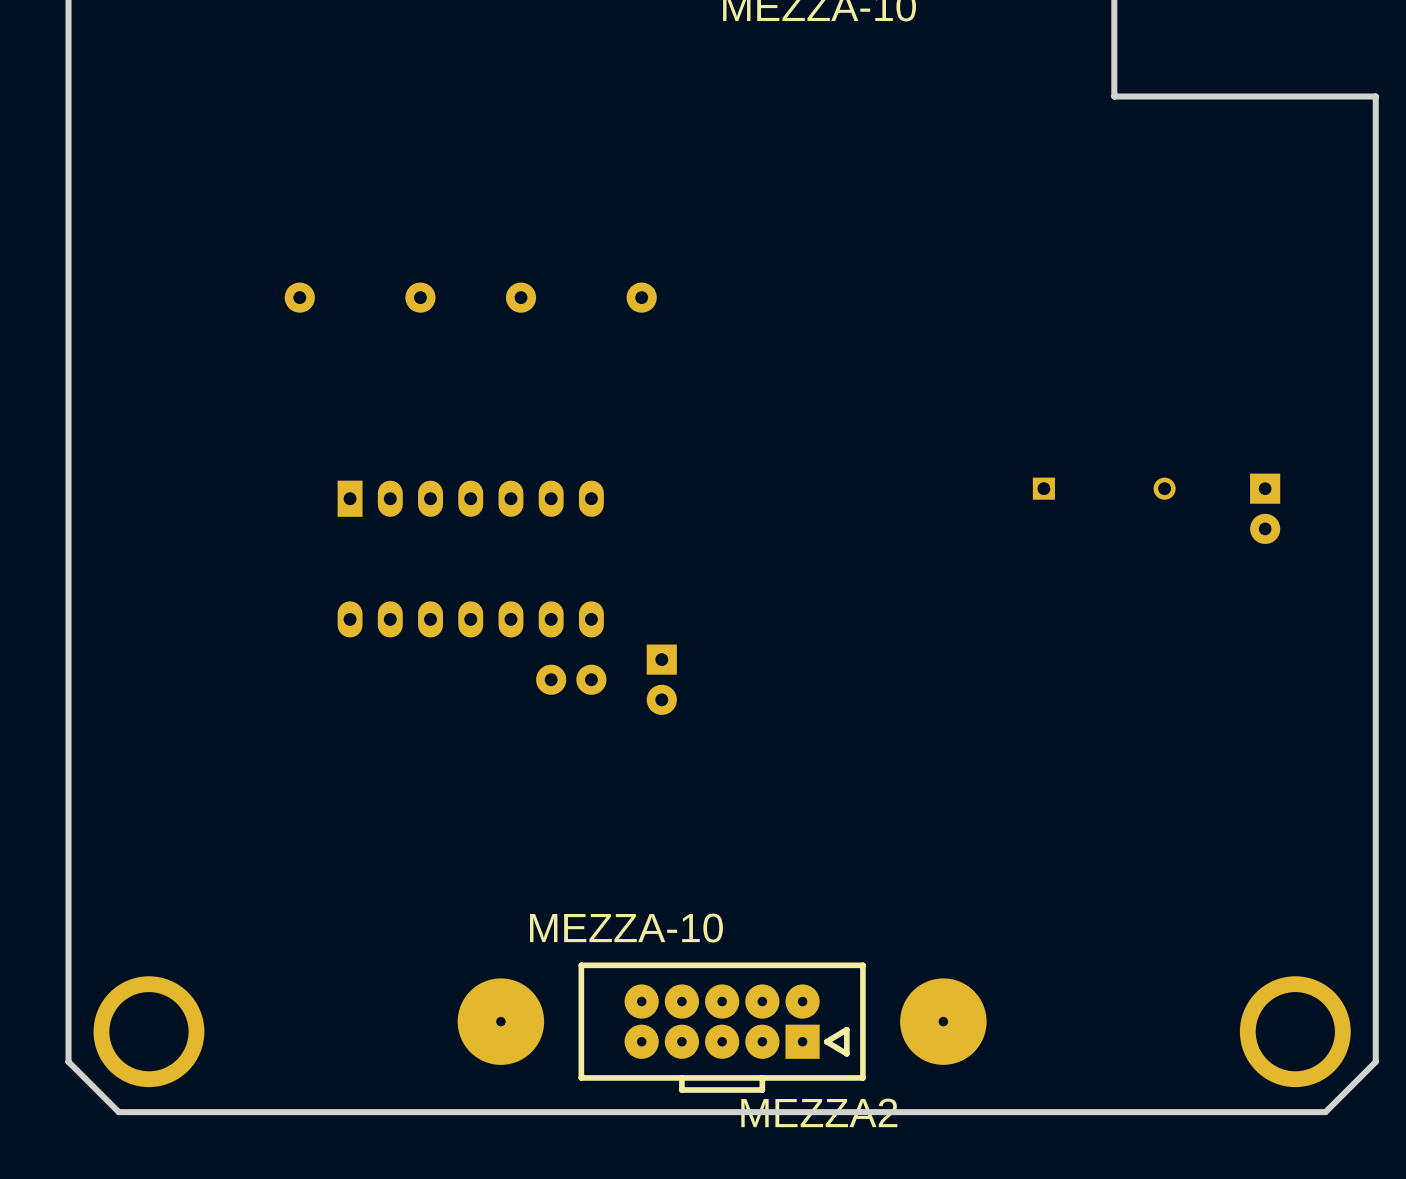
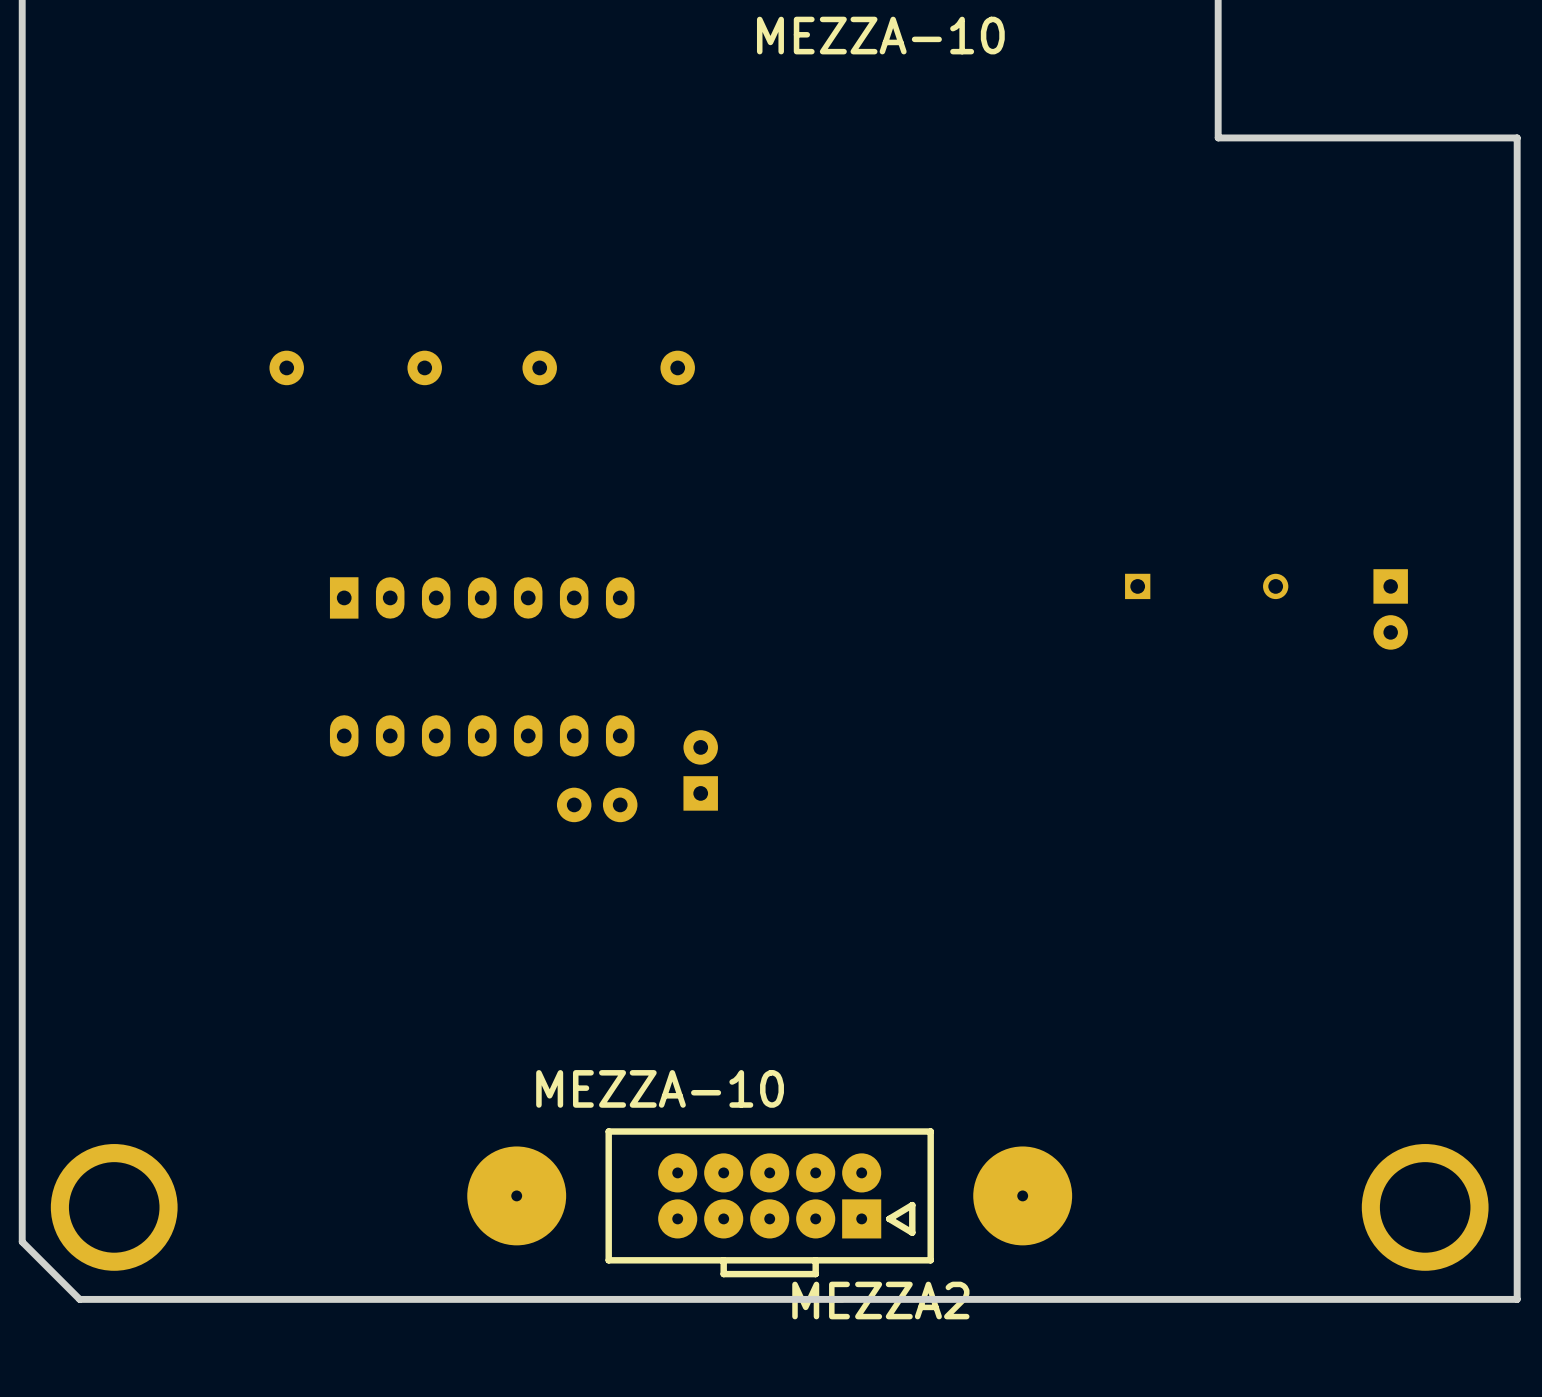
part rotation: 0° (661, 679) -> 180° (700, 770)
board edge: (1375, 1061) (1325, 1112) -> (1517, 1241) (1517, 1299) (1459, 1299)

